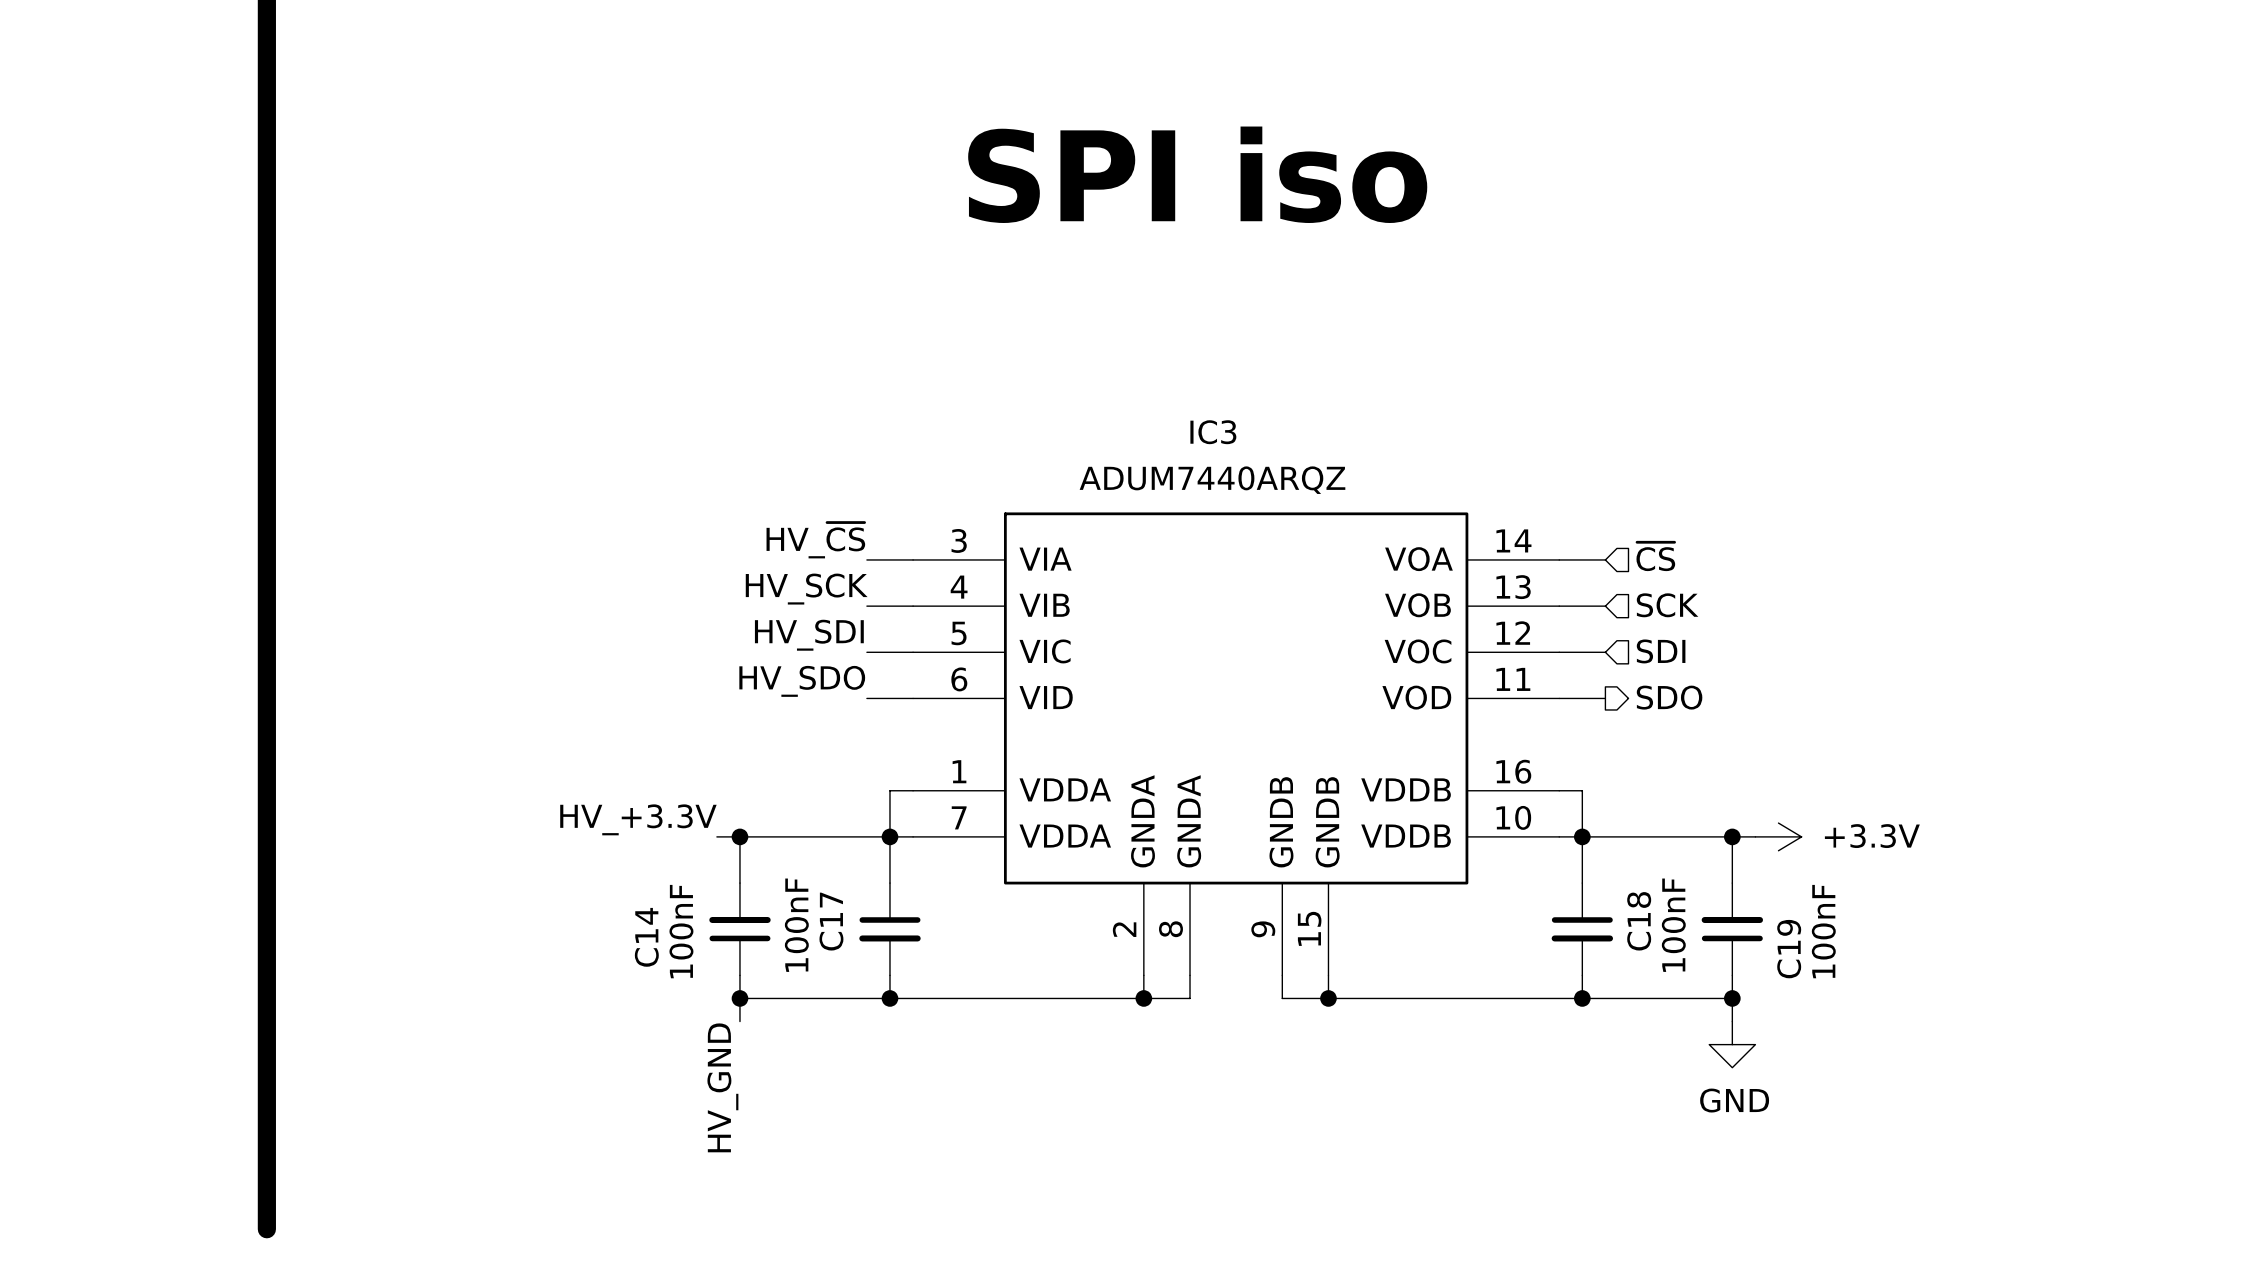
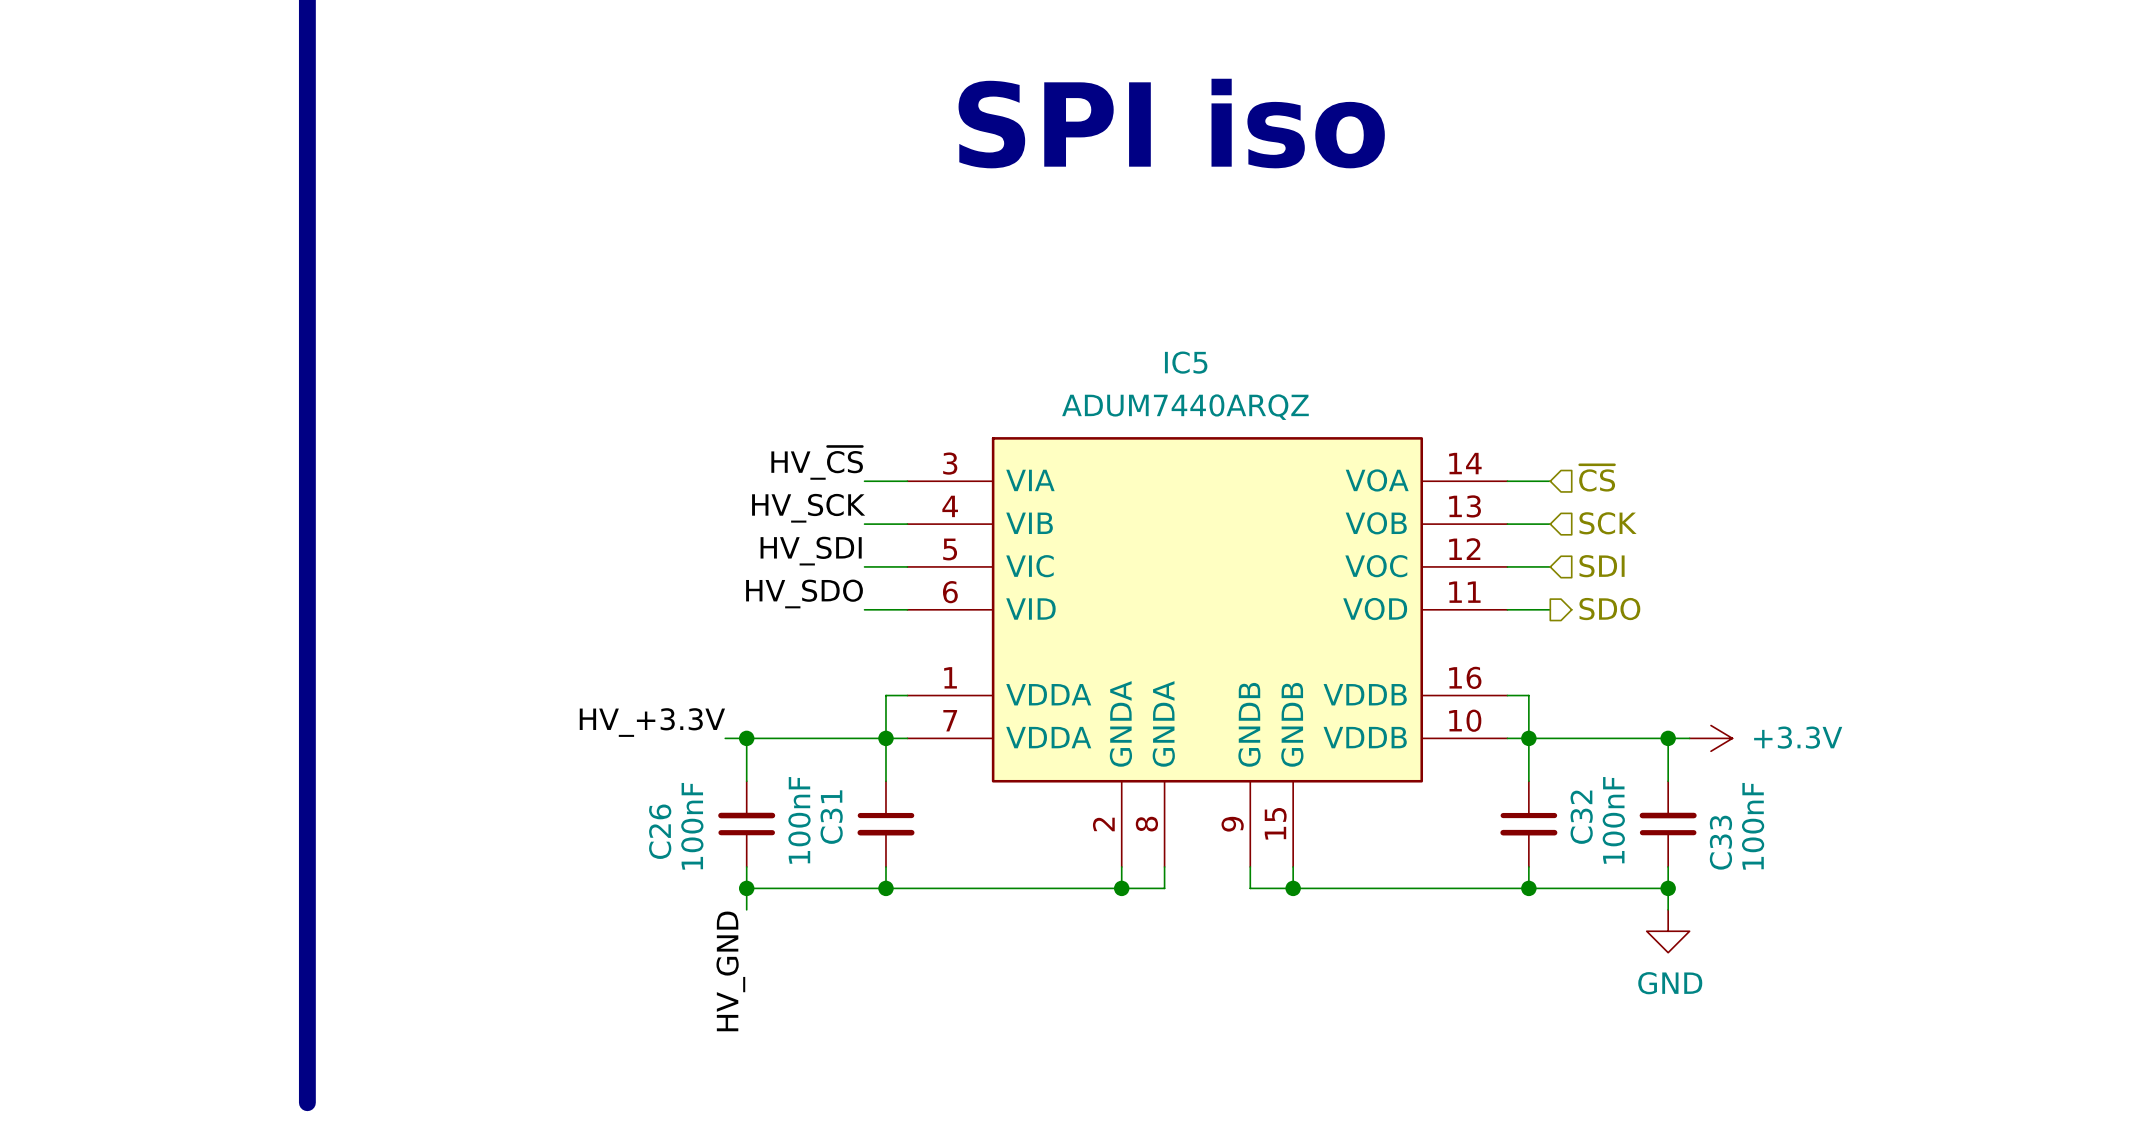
IC3 name: IC3 (1213, 432) -> IC5 (1186, 362)
C17 name: C17 (831, 921) -> C31 (831, 817)
C18 name: C18 (1639, 921) -> C32 (1581, 817)
C14 name: C14 (646, 937) -> C26 (660, 831)
C19 name: C19 (1789, 949) -> C33 (1720, 842)

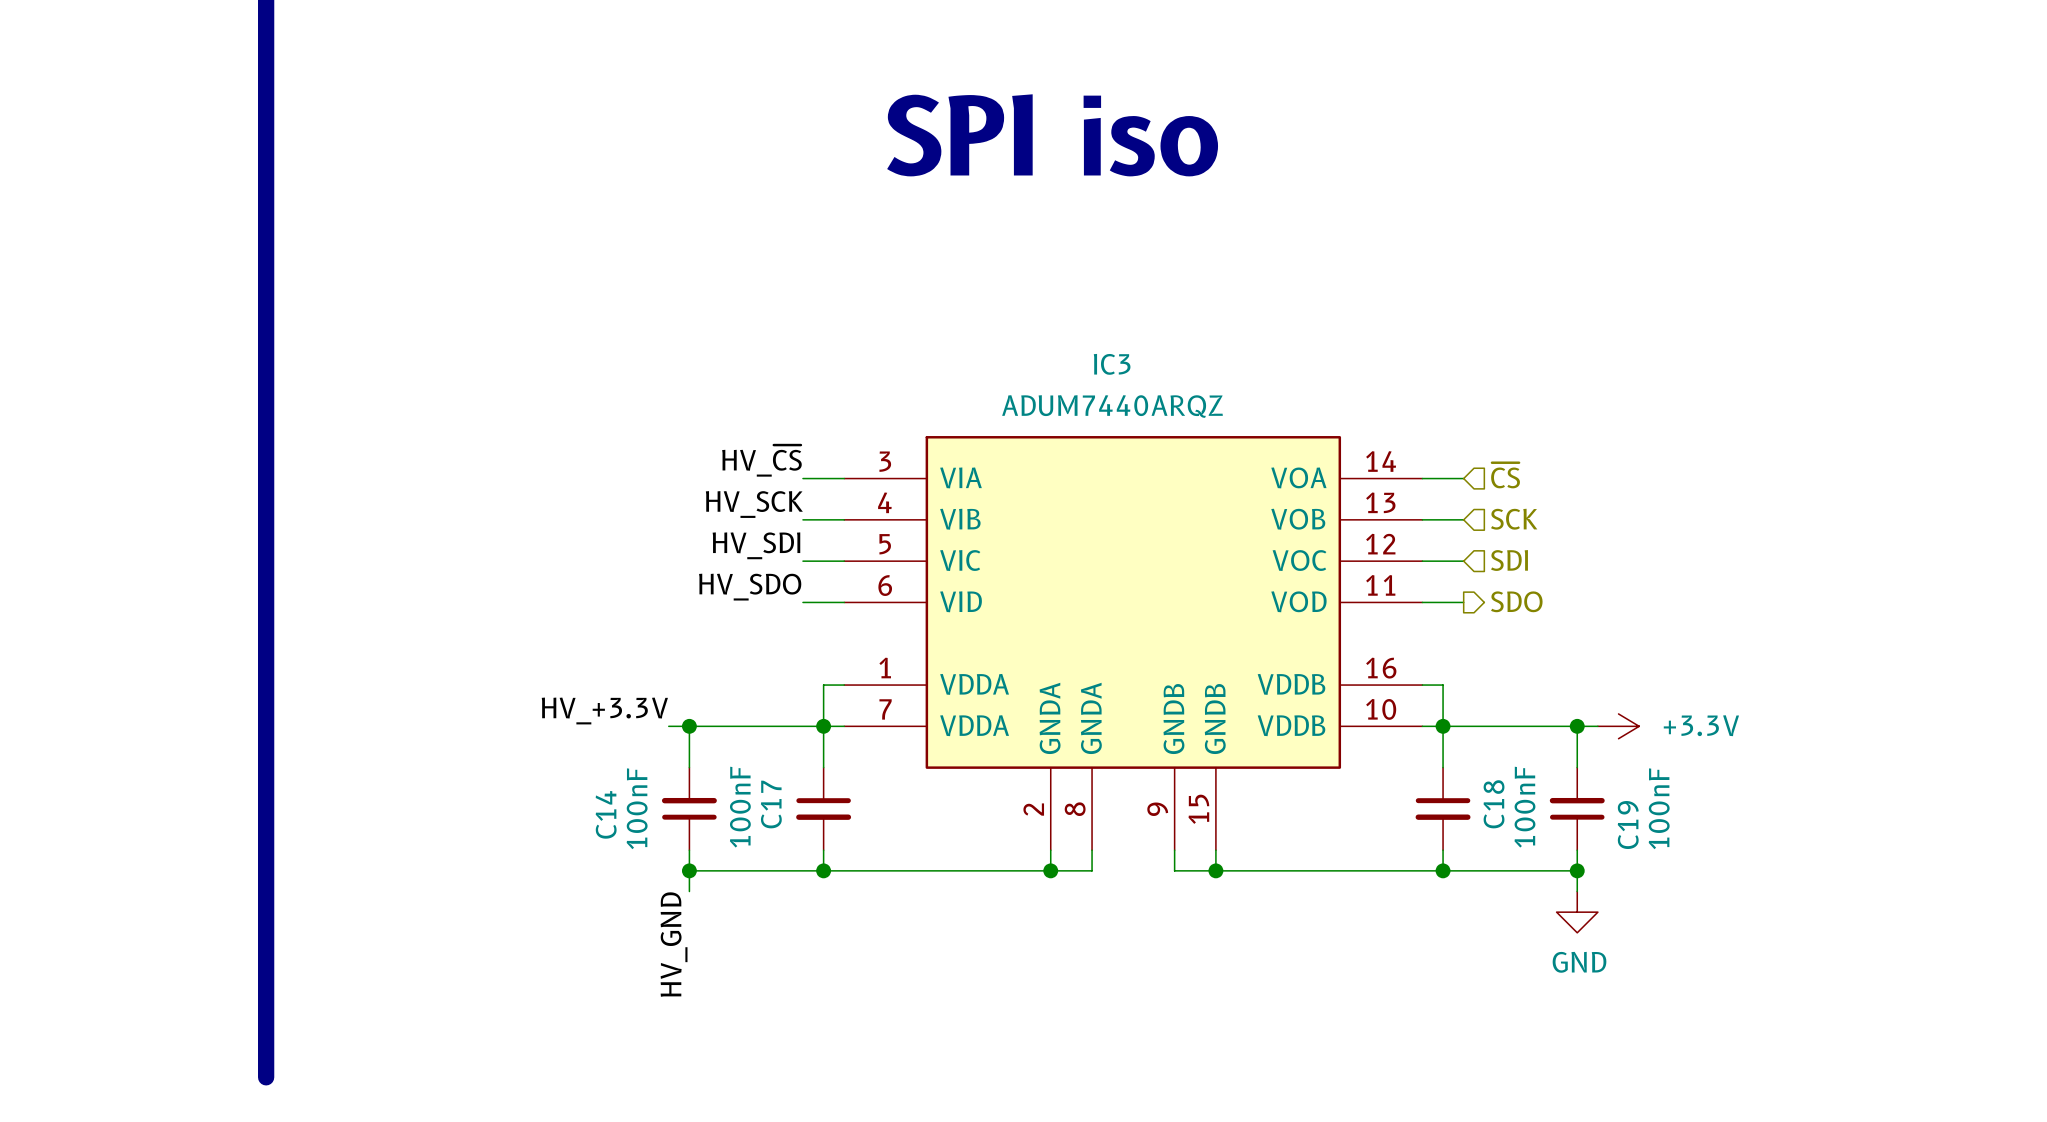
IC5 name: IC5 (1186, 362) -> IC3 (1112, 364)
C31 name: C31 (831, 817) -> C17 (771, 804)
C32 name: C32 (1581, 817) -> C18 (1494, 804)
C26 name: C26 (660, 831) -> C14 (606, 814)
C33 name: C33 (1720, 842) -> C19 (1628, 825)

